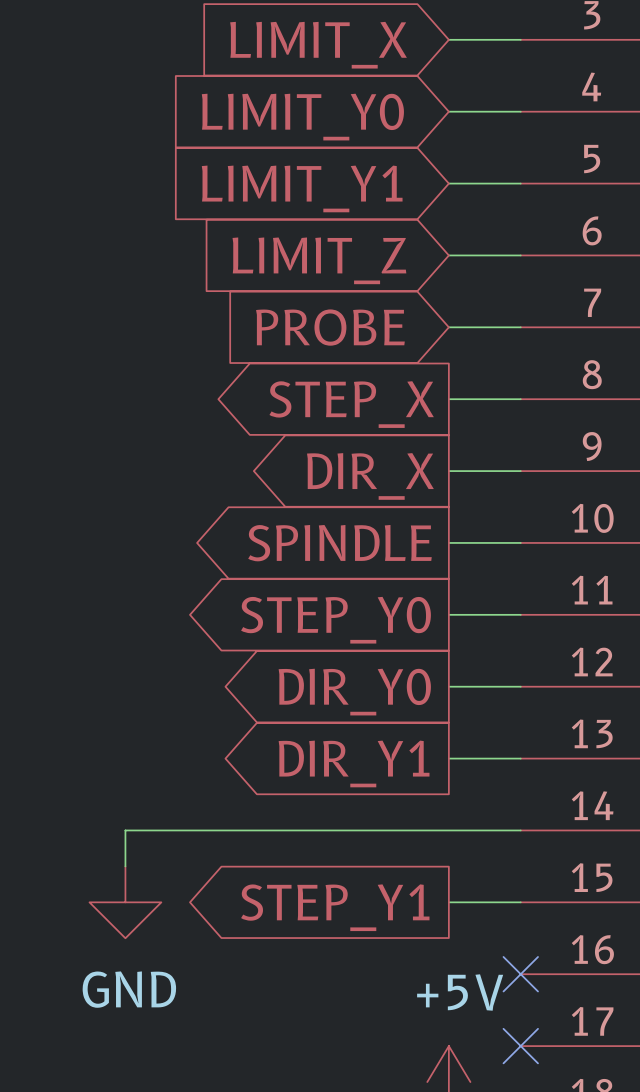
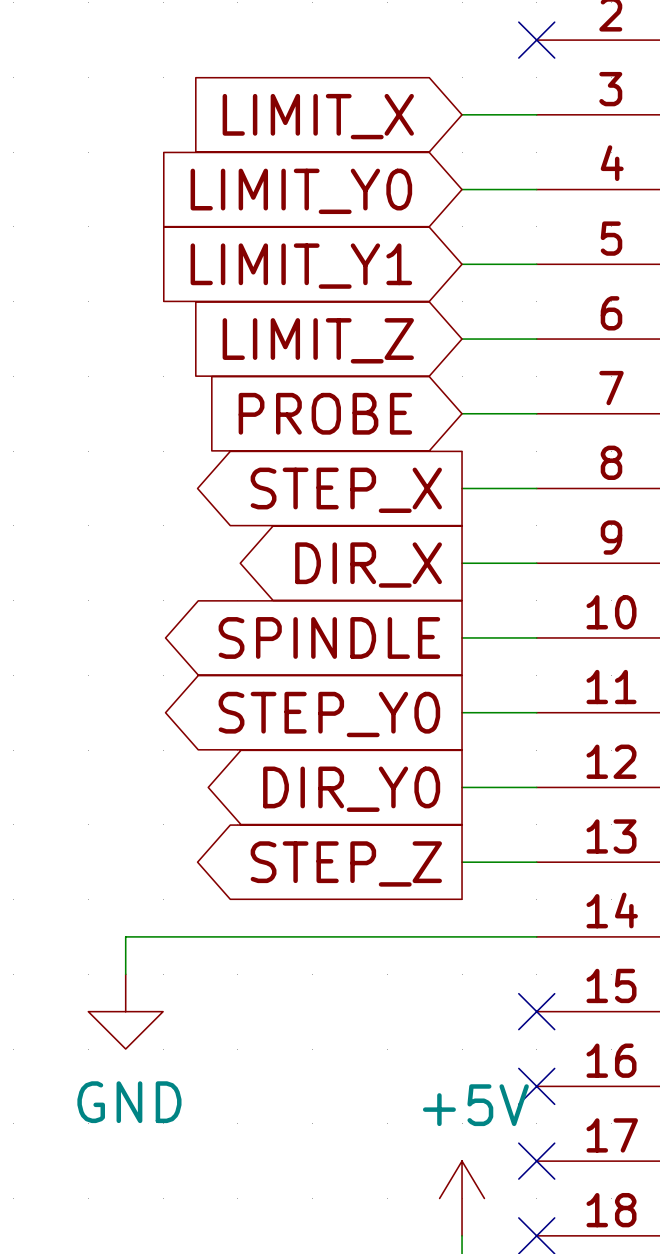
global label: DIR_Y1 (354, 763) -> STEP_Z (346, 863)
wire: (448, 902) (520, 902) -> none
no-connect mark: none -> (536, 1011)
global label: STEP_Y1 (335, 907) -> none

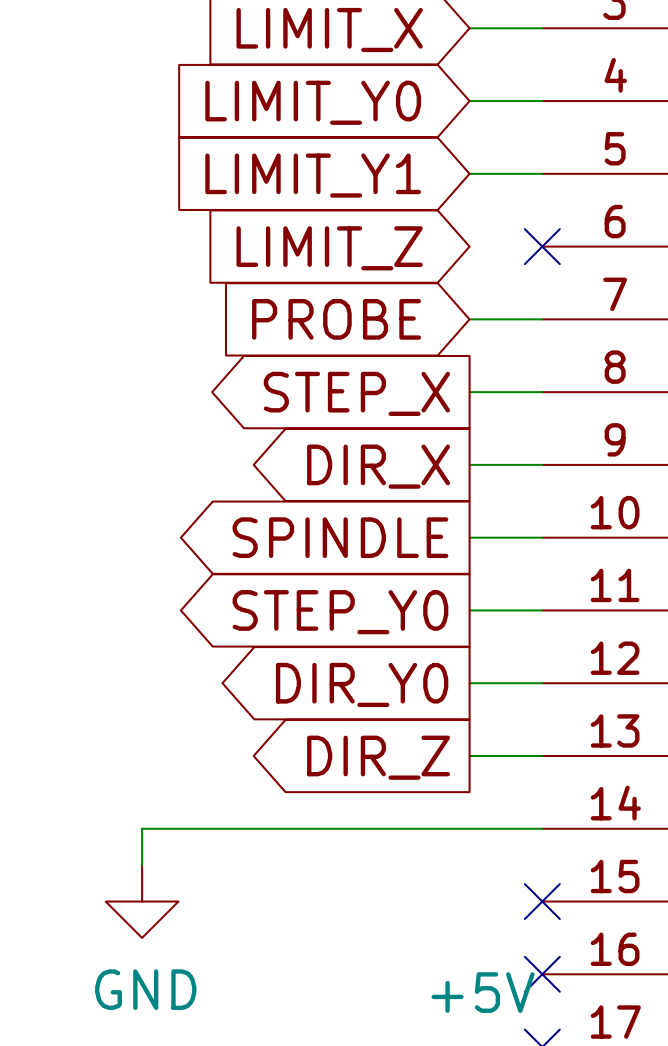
wire: (462, 339) (536, 339) -> none
no-connect mark: none -> (542, 246)
global label: STEP_Z (346, 863) -> DIR_Z (378, 757)

